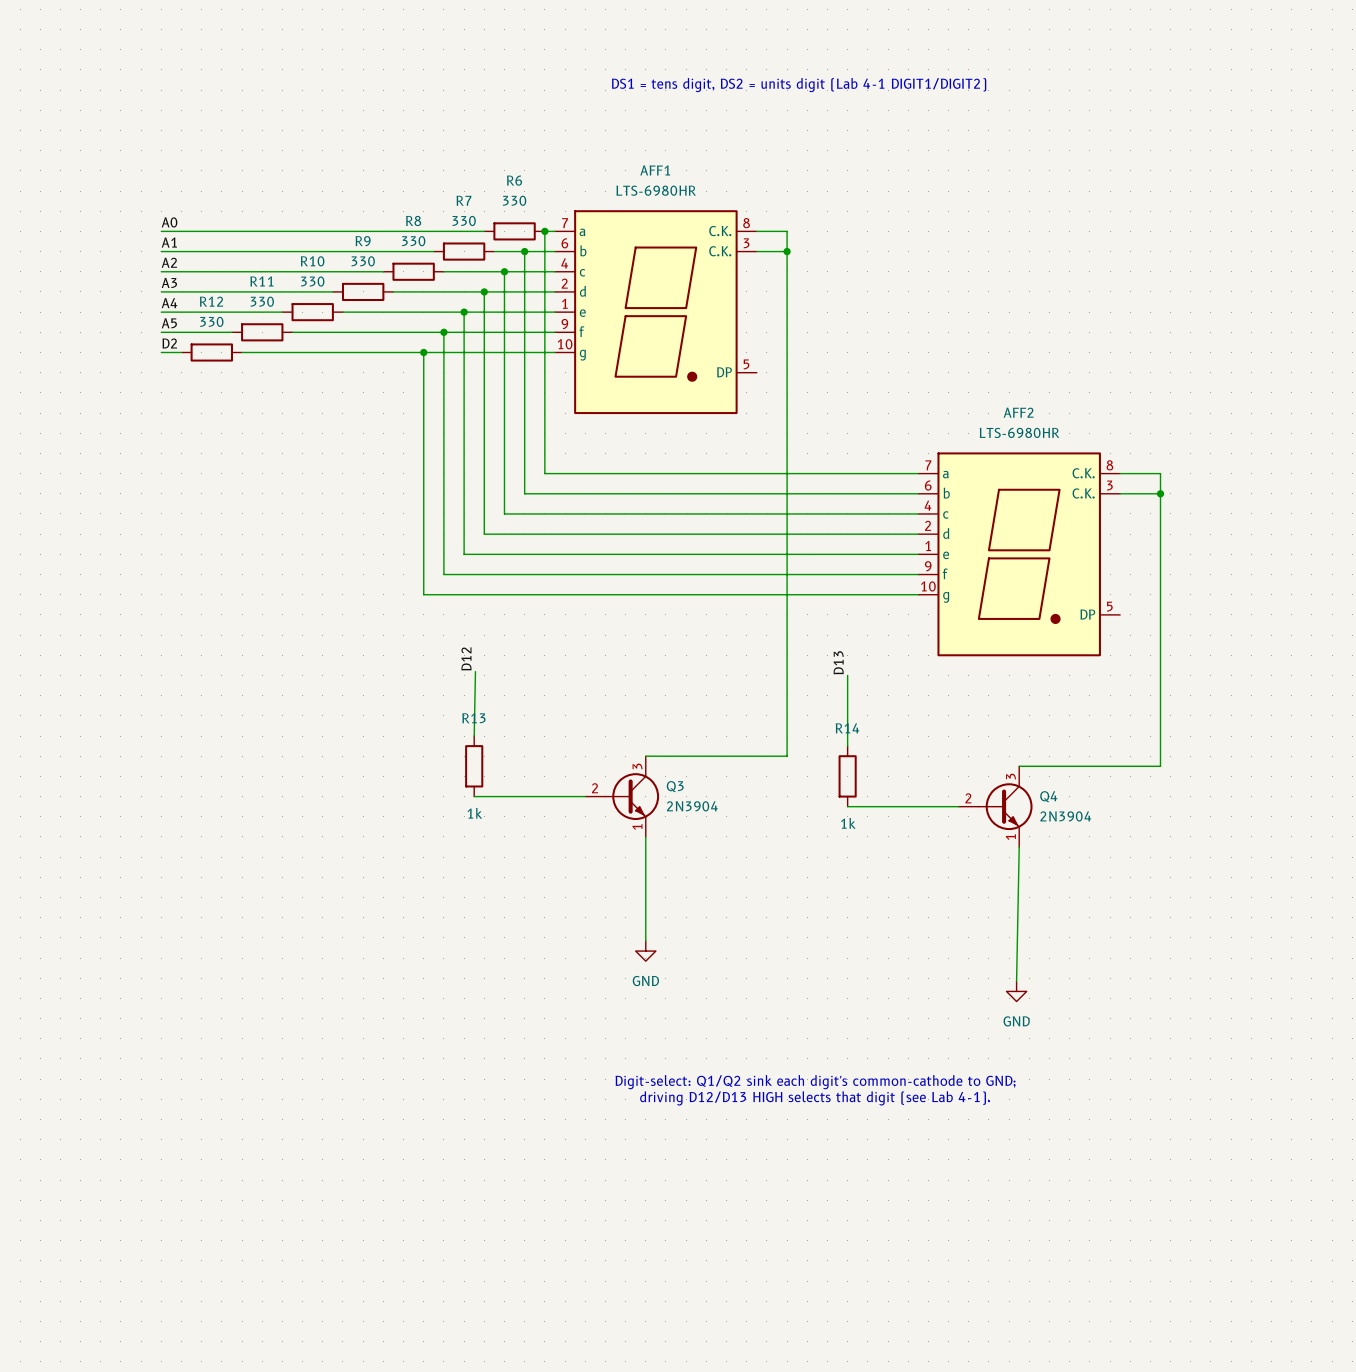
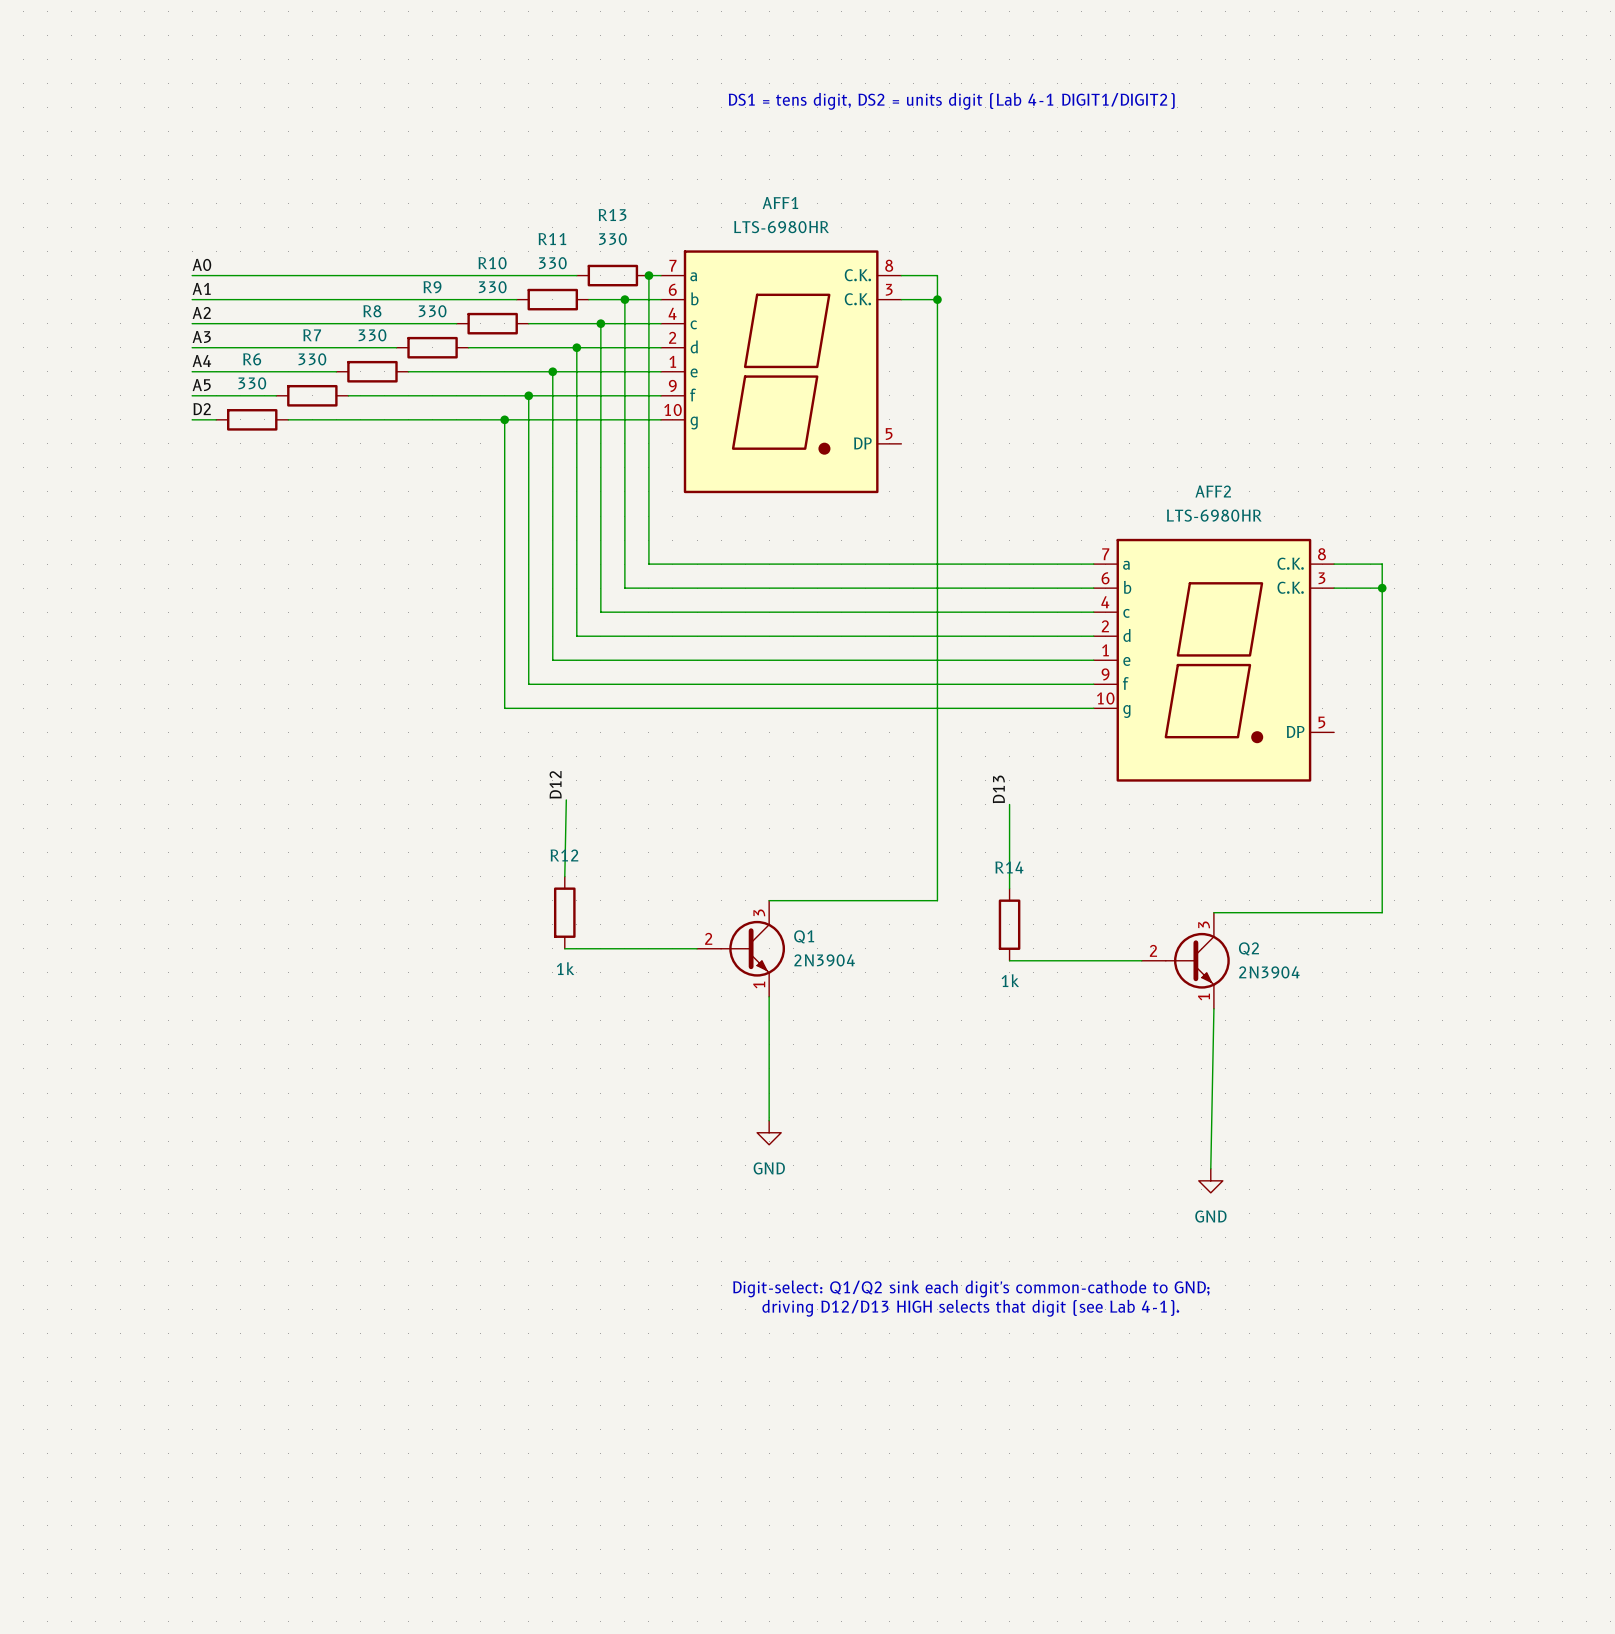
R6 name: R6 (514, 180) -> R13 (612, 215)
R7 name: R7 (463, 200) -> R11 (552, 239)
R8 name: R8 (413, 220) -> R10 (492, 263)
R10 name: R10 (312, 261) -> R8 (372, 311)
R11 name: R11 (261, 281) -> R7 (312, 335)
R12 name: R12 (211, 301) -> R6 (252, 359)
R13 name: R13 (473, 718) -> R12 (564, 855)
Q3 name: Q3 (675, 786) -> Q1 (804, 936)
Q4 name: Q4 (1048, 796) -> Q2 (1248, 948)

